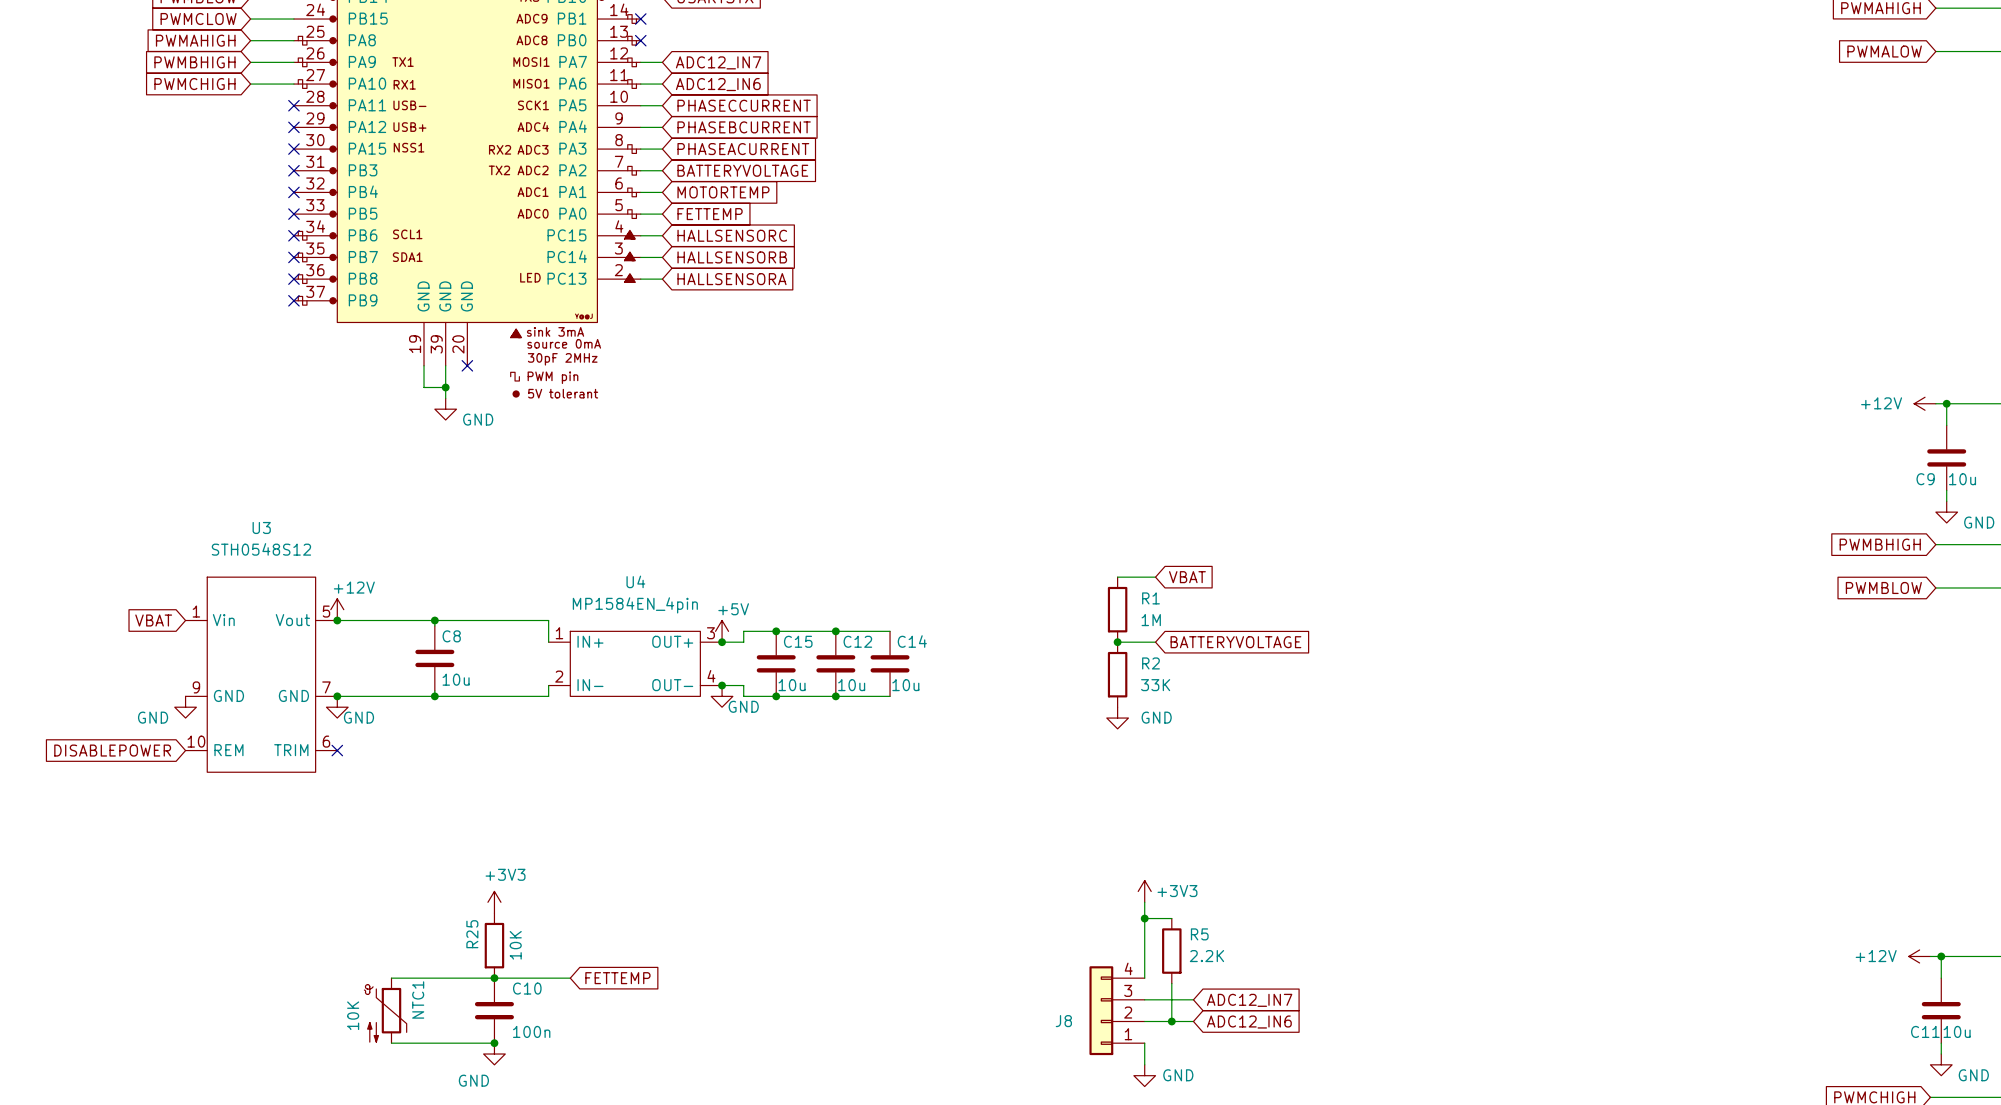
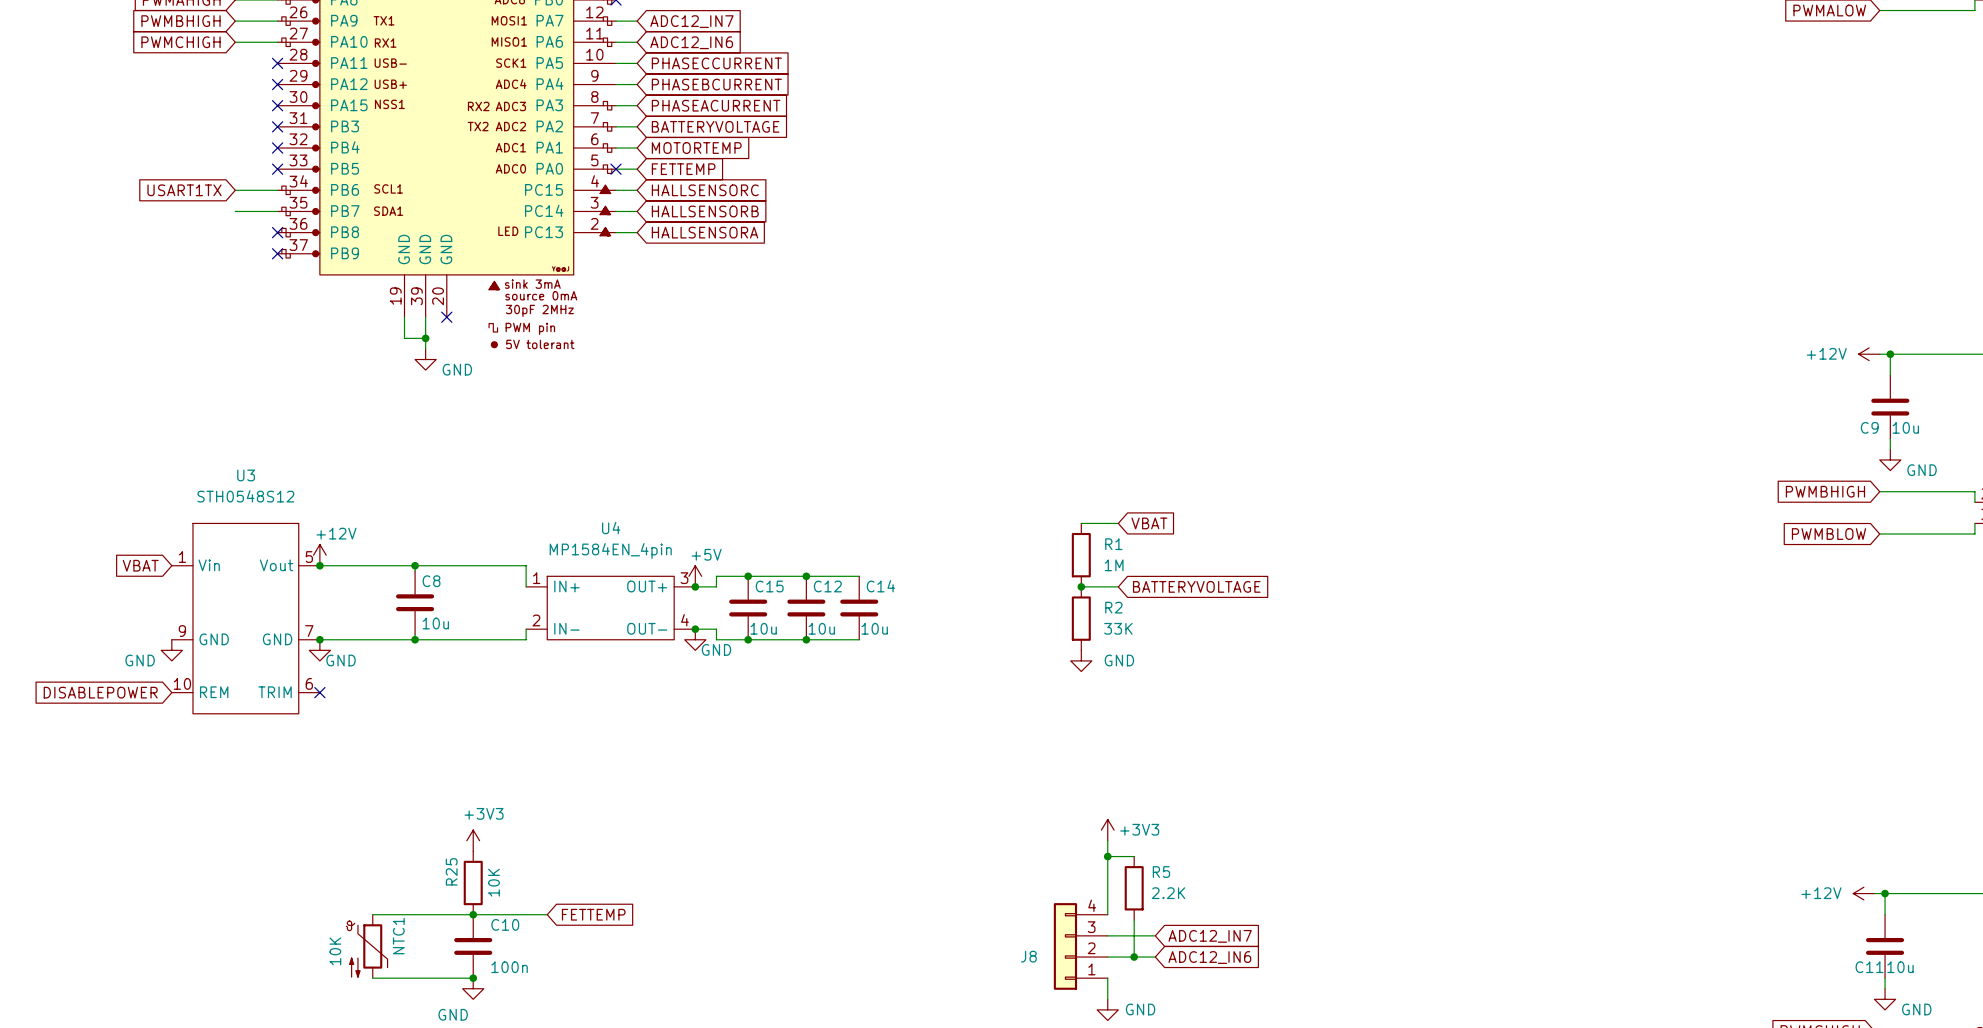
no-connect mark: none -> (616, 169)
global label: none -> USART1TX (184, 190)
wire: none -> (235, 190) (277, 190)
no-connect mark: (293, 235) -> none
wire: none -> (235, 211) (277, 211)
no-connect mark: (293, 257) -> none

